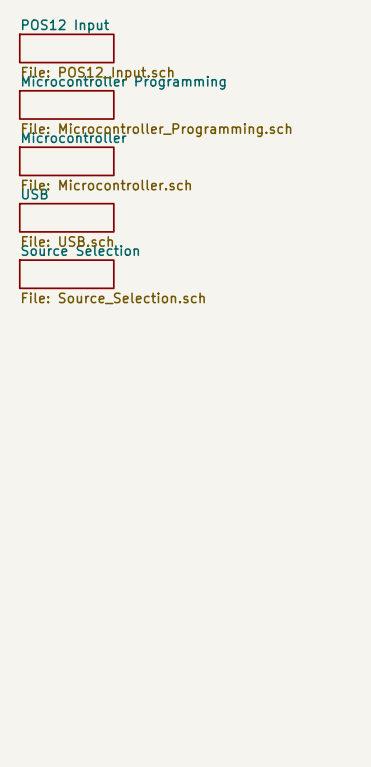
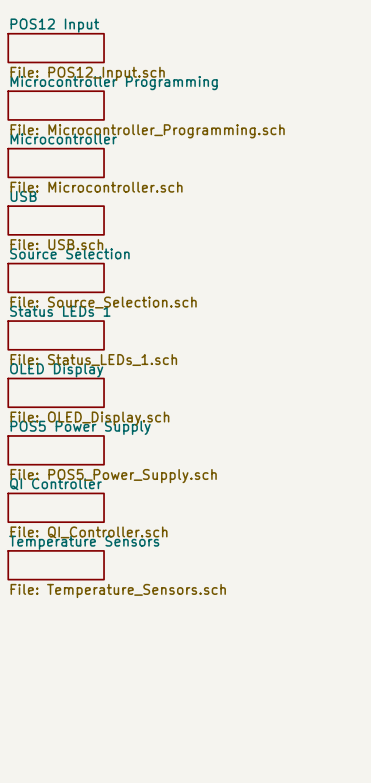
sheet Status LEDs 1: none -> File: Status_LEDs_1.sch (56, 335)
sheet OLED Display: none -> File: OLED_Display.sch (56, 392)
sheet POS5 Power Supply: none -> File: POS5_Power_Supply.sch (56, 450)
sheet QI Controller: none -> File: QI_Controller.sch (56, 507)
sheet Temperature Sensors: none -> File: Temperature_Sensors.sch (56, 565)

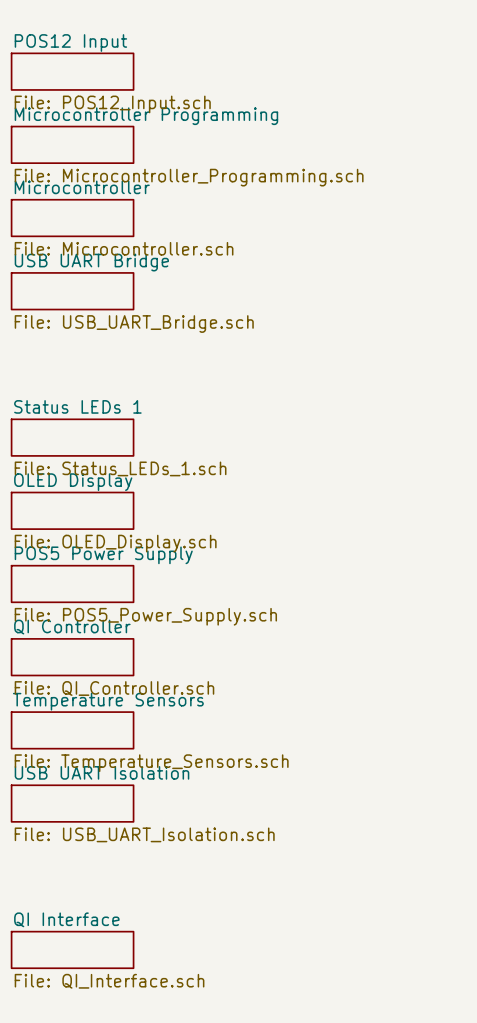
sheet USB name: USB (23, 196) -> USB UART Bridge (91, 262)
sheet USB value: File: USB.sch (56, 244) -> File: USB_UART_Bridge.sch (134, 324)
sheet Source Selection: File: Source_Selection.sch (56, 277) -> none
sheet USB UART Isolation: none -> File: USB_UART_Isolation.sch (72, 803)
sheet QI Interface: none -> File: QI_Interface.sch (72, 949)

